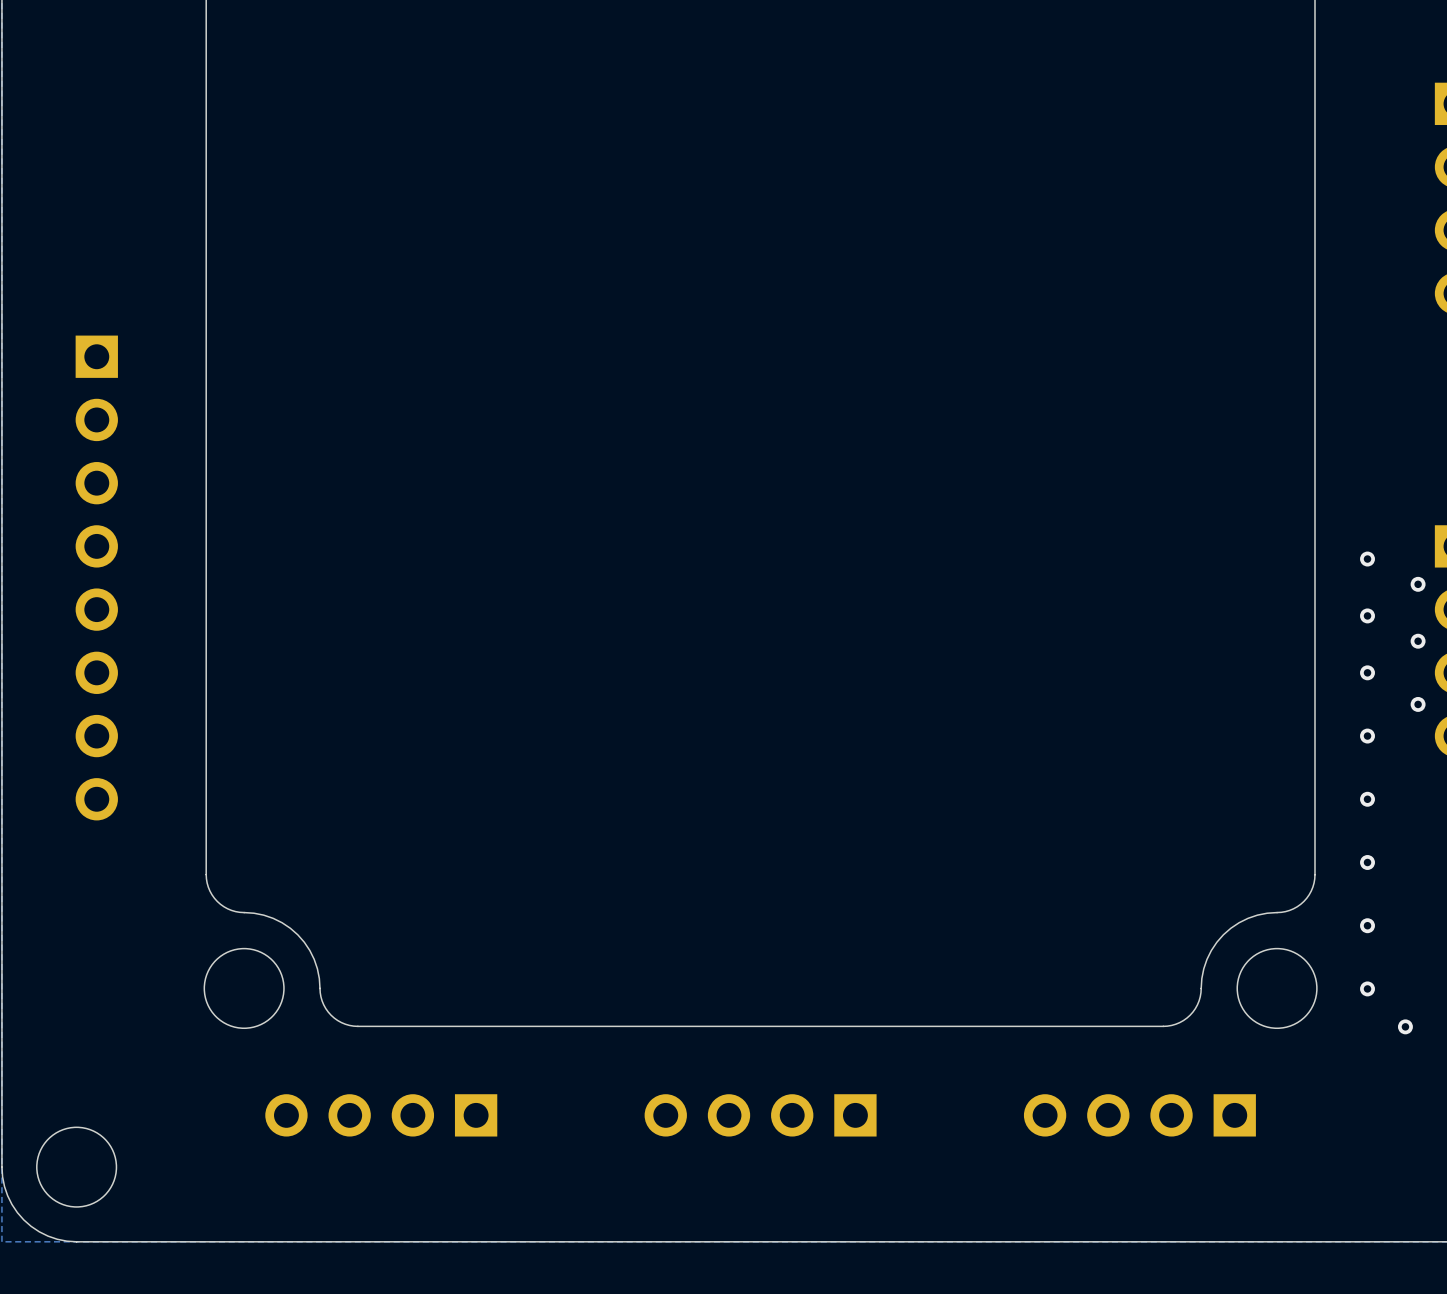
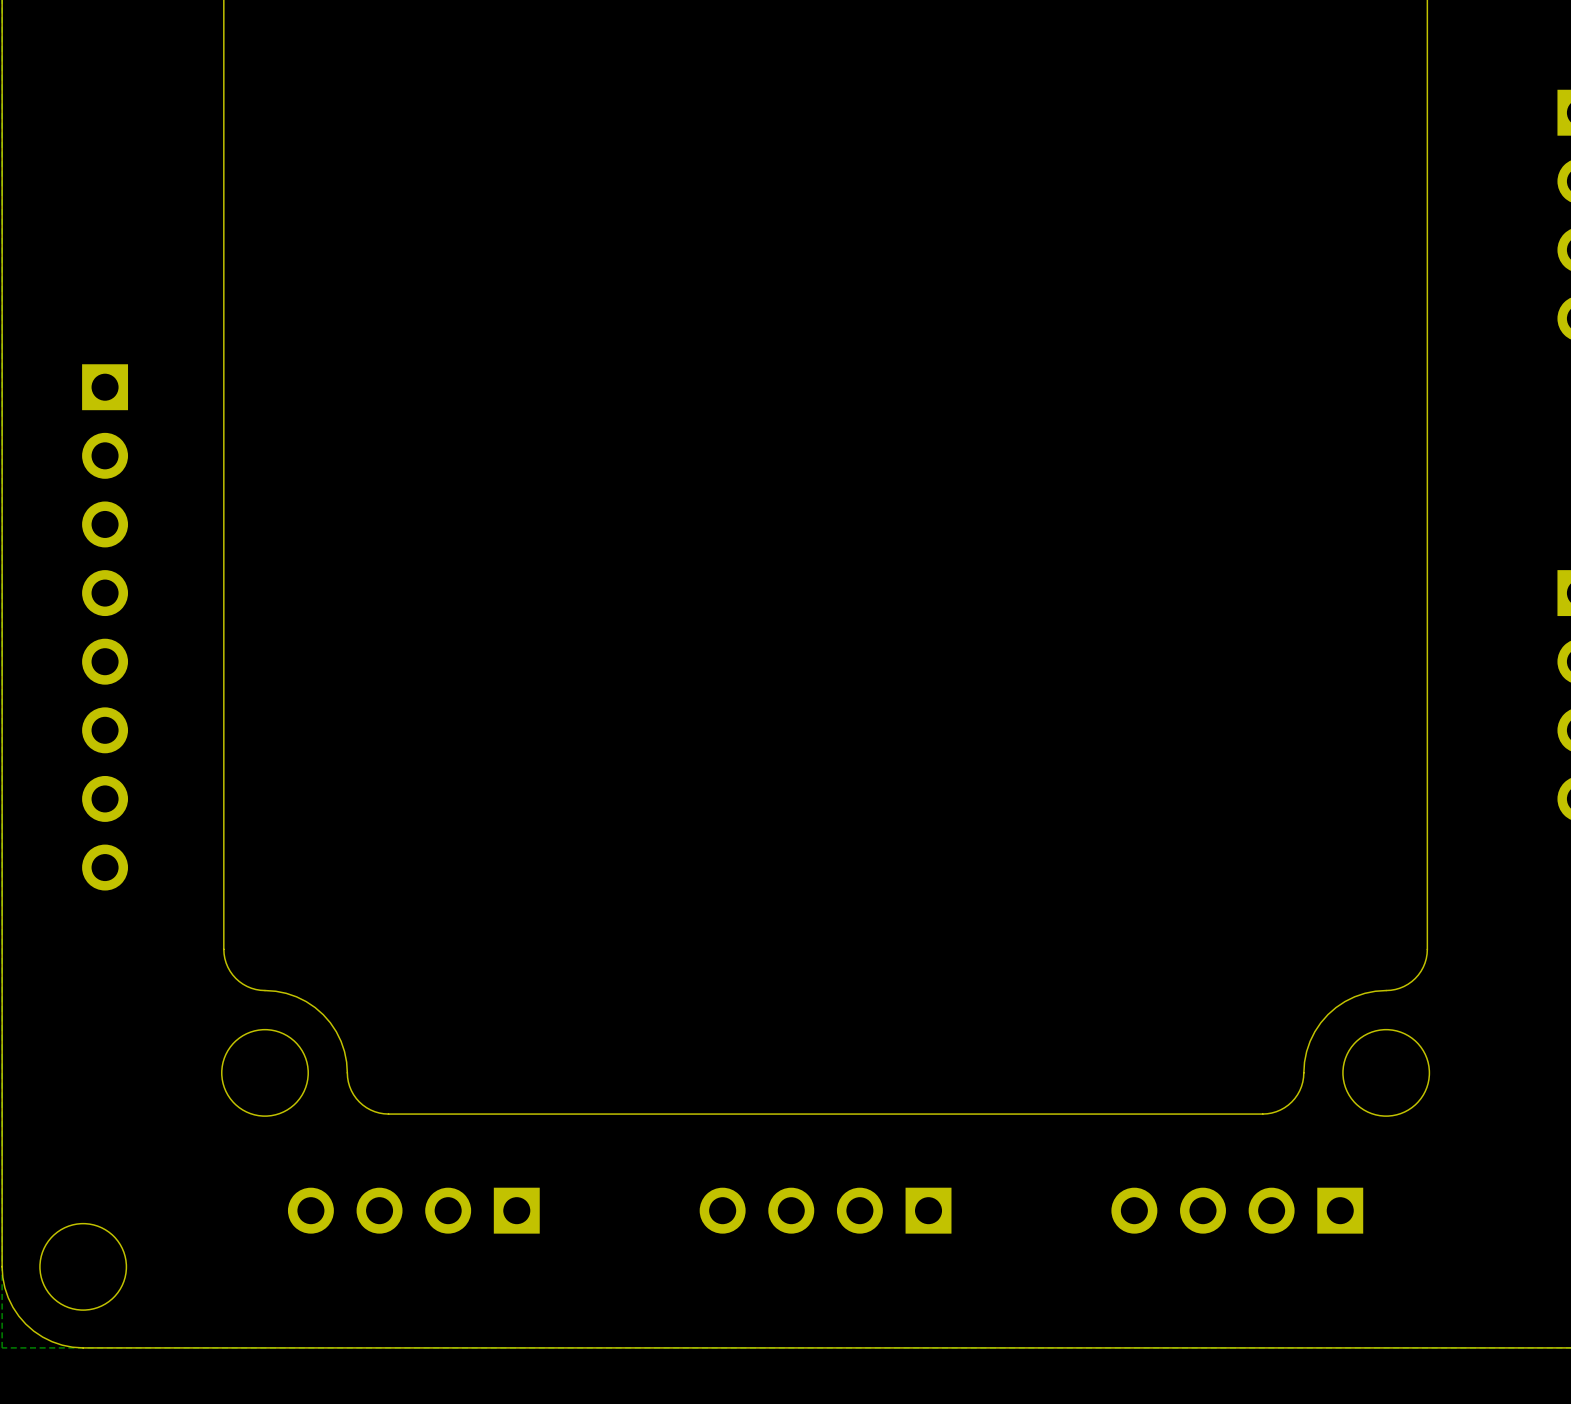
via: (1367, 559) -> none
via: (1418, 584) -> none
via: (1367, 615) -> none
via: (1418, 641) -> none
via: (1367, 672) -> none
via: (1418, 704) -> none
via: (1367, 736) -> none
via: (1367, 799) -> none
via: (1367, 862) -> none
via: (1367, 925) -> none
via: (1367, 988) -> none
via: (1405, 1026) -> none

